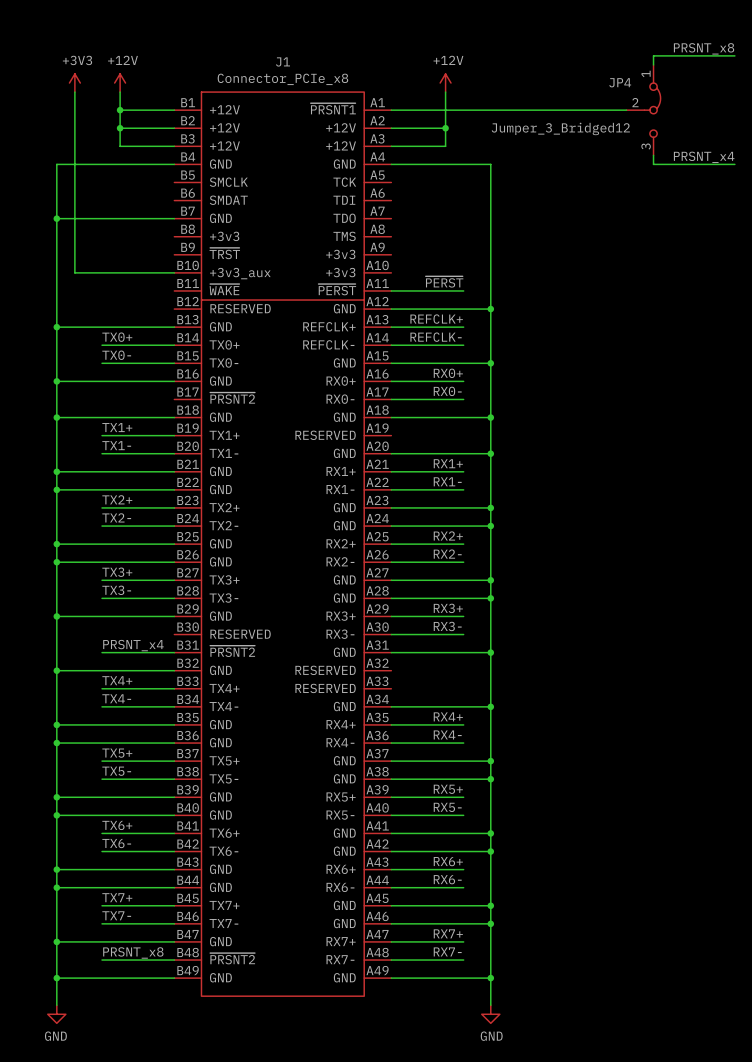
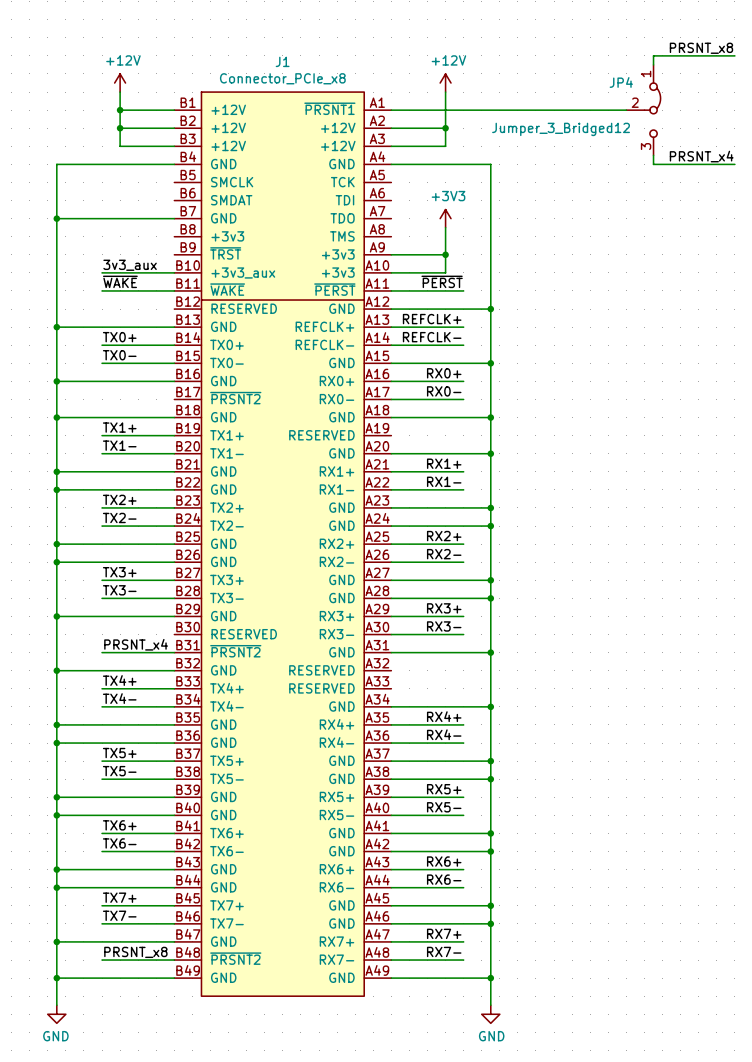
power symbol: +3V3 (74, 83) -> none
wire: (74, 92) (74, 272) (102, 272) -> none
power symbol: none -> +3V3 (445, 218)
wire: none -> (445, 227) (445, 272) (391, 272)
wire: none -> (391, 254) (445, 254)
junction: none -> (445, 254)
label: none -> 3v3_aux (130, 265)
label: none -> ~{WAKE} (120, 281)
wire: none -> (102, 290) (174, 290)

